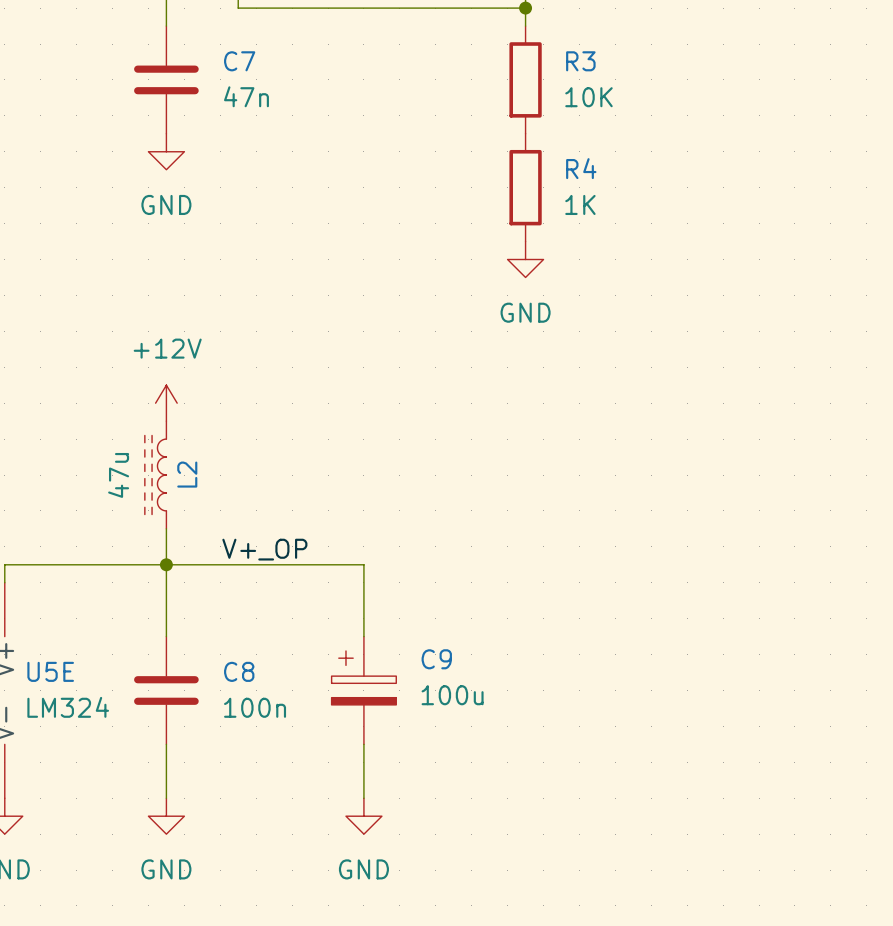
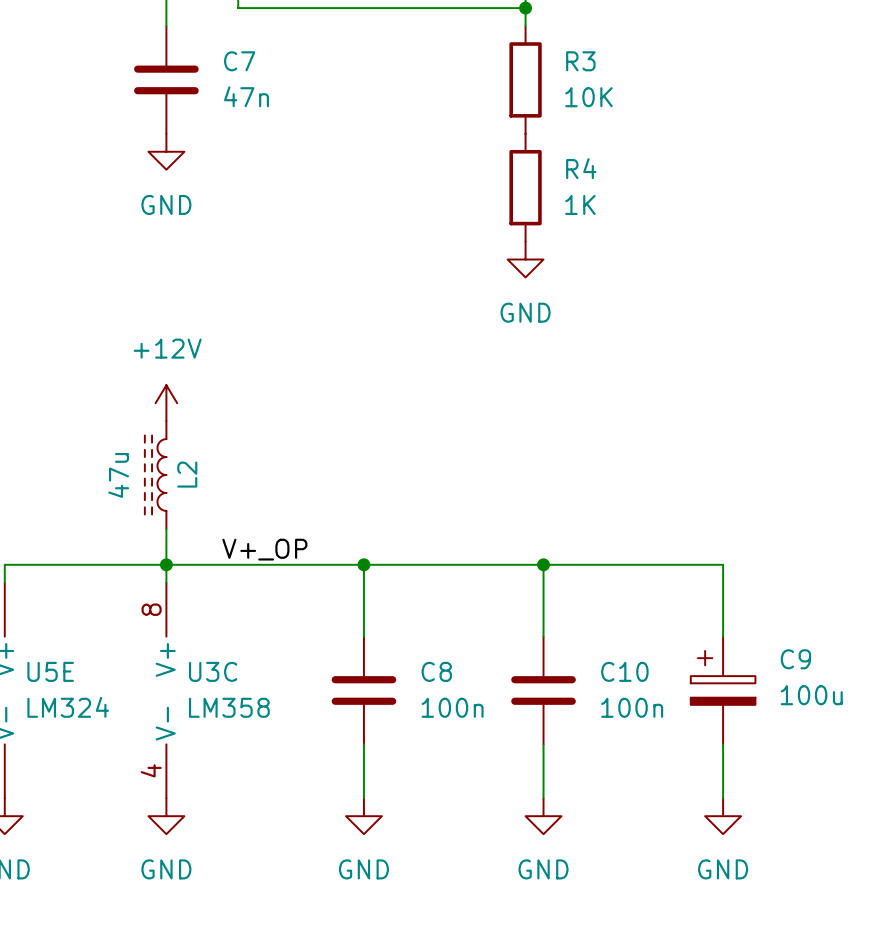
wire: none -> (363, 564) (723, 564) (723, 636)
junction: none -> (363, 564)
wire: none -> (543, 564) (543, 636)
junction: none -> (543, 564)
C8 position: (166, 690) -> (363, 690)
U3C: none -> LM358 (166, 690)
C9 position: (363, 690) -> (723, 690)
C10: none -> 100n (543, 690)
wire: none -> (543, 744) (543, 798)
wire: none -> (723, 744) (723, 798)
power symbol: none -> GND (543, 816)
power symbol: none -> GND (723, 816)

